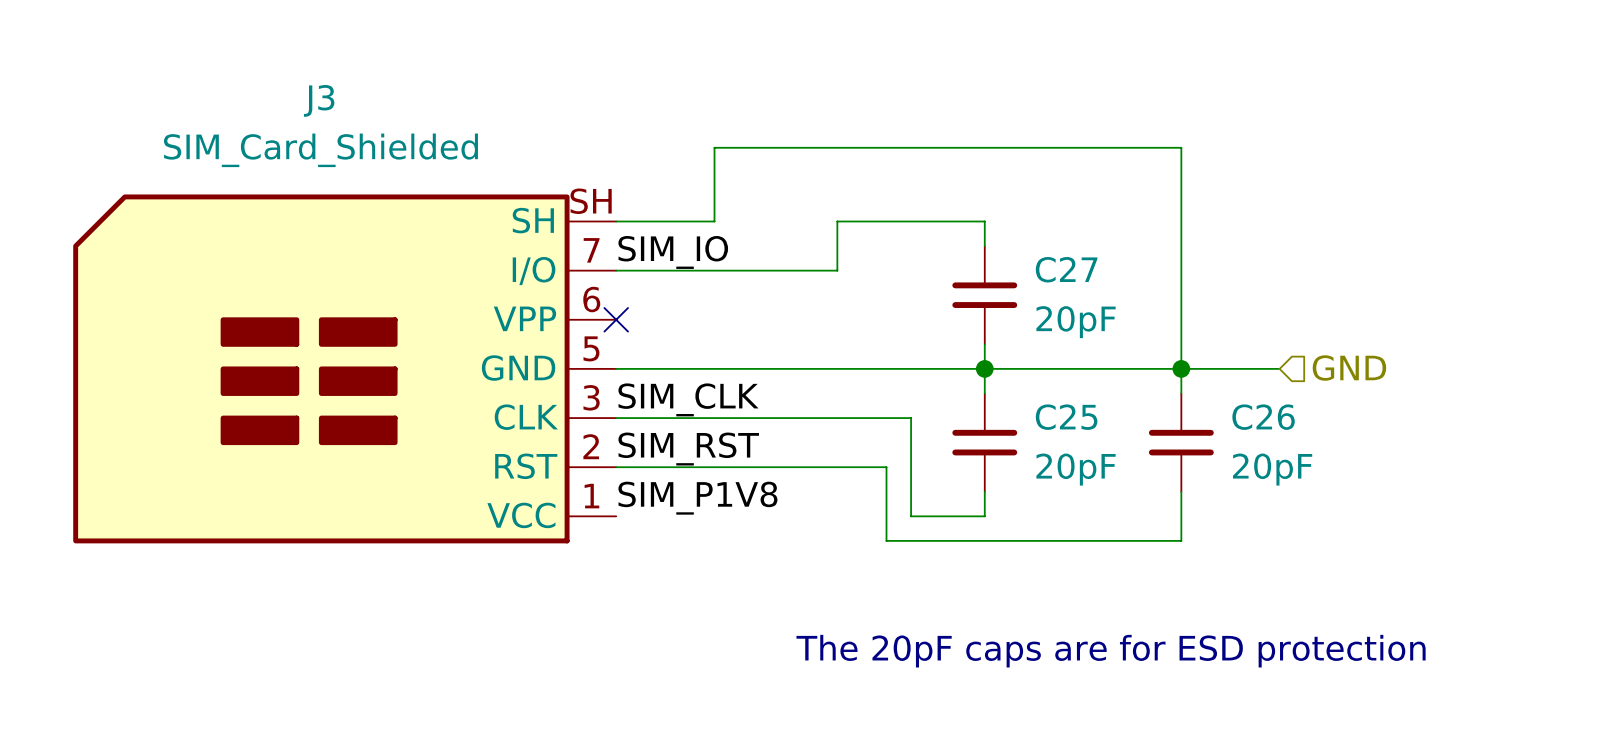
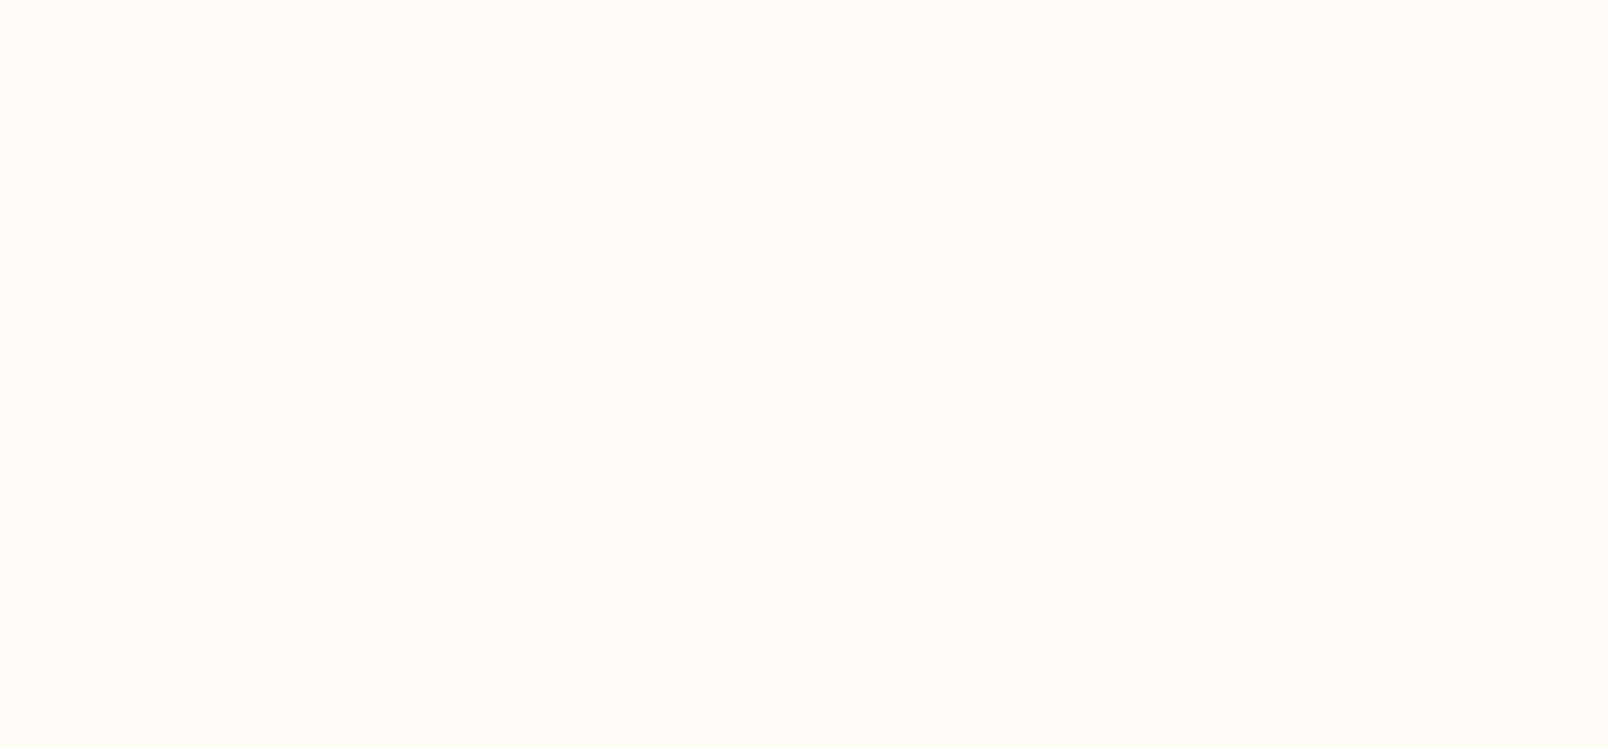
wire: (616, 221) (714, 221) (714, 147) (1181, 147) (1181, 393) -> none
wire: (984, 246) (984, 221) (837, 221) (837, 270) (616, 270) -> none
label: SIM_IO (673, 252) -> none
C27: 20pF (984, 295) -> none
no-connect mark: (616, 319) -> none
wire: (984, 344) (984, 393) -> none
J3: SIM_Card_Shielded (344, 368) -> none
wire: (616, 368) (1279, 368) -> none
junction: (984, 368) -> none
junction: (1181, 368) -> none
hierarchical label: GND (1349, 368) -> none
label: SIM_CLK (688, 399) -> none
wire: (616, 418) (911, 418) (911, 516) (984, 516) (984, 491) -> none
C25: 20pF (984, 442) -> none
C26: 20pF (1181, 442) -> none
label: SIM_RST (688, 449) -> none
wire: (616, 467) (886, 467) (886, 540) (1181, 540) (1181, 491) -> none
label: SIM_P1V8 (697, 498) -> none
text: The 20pF caps are for ESD protection (1111, 651) -> none

